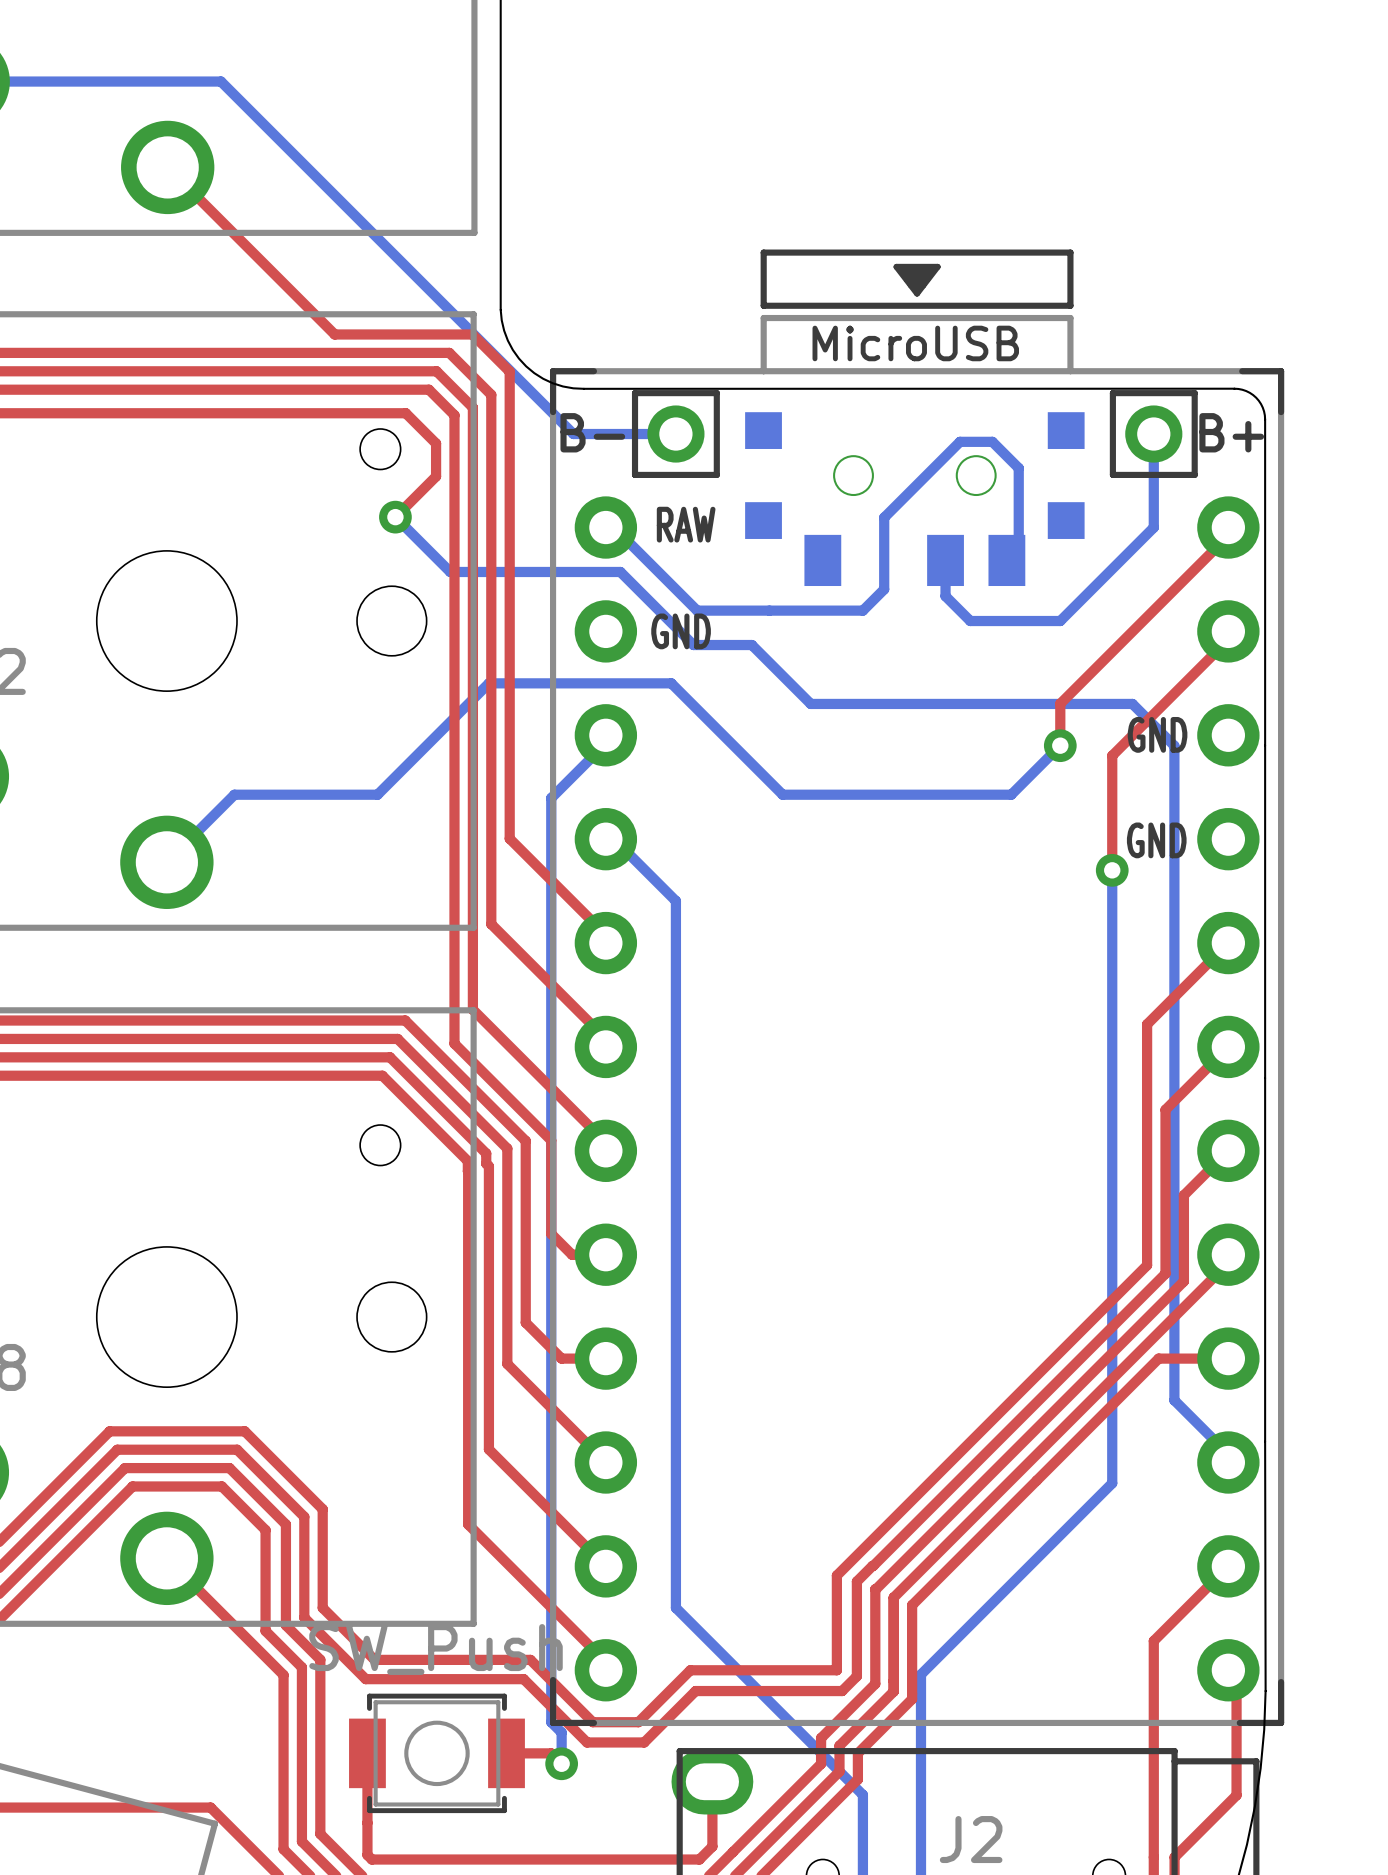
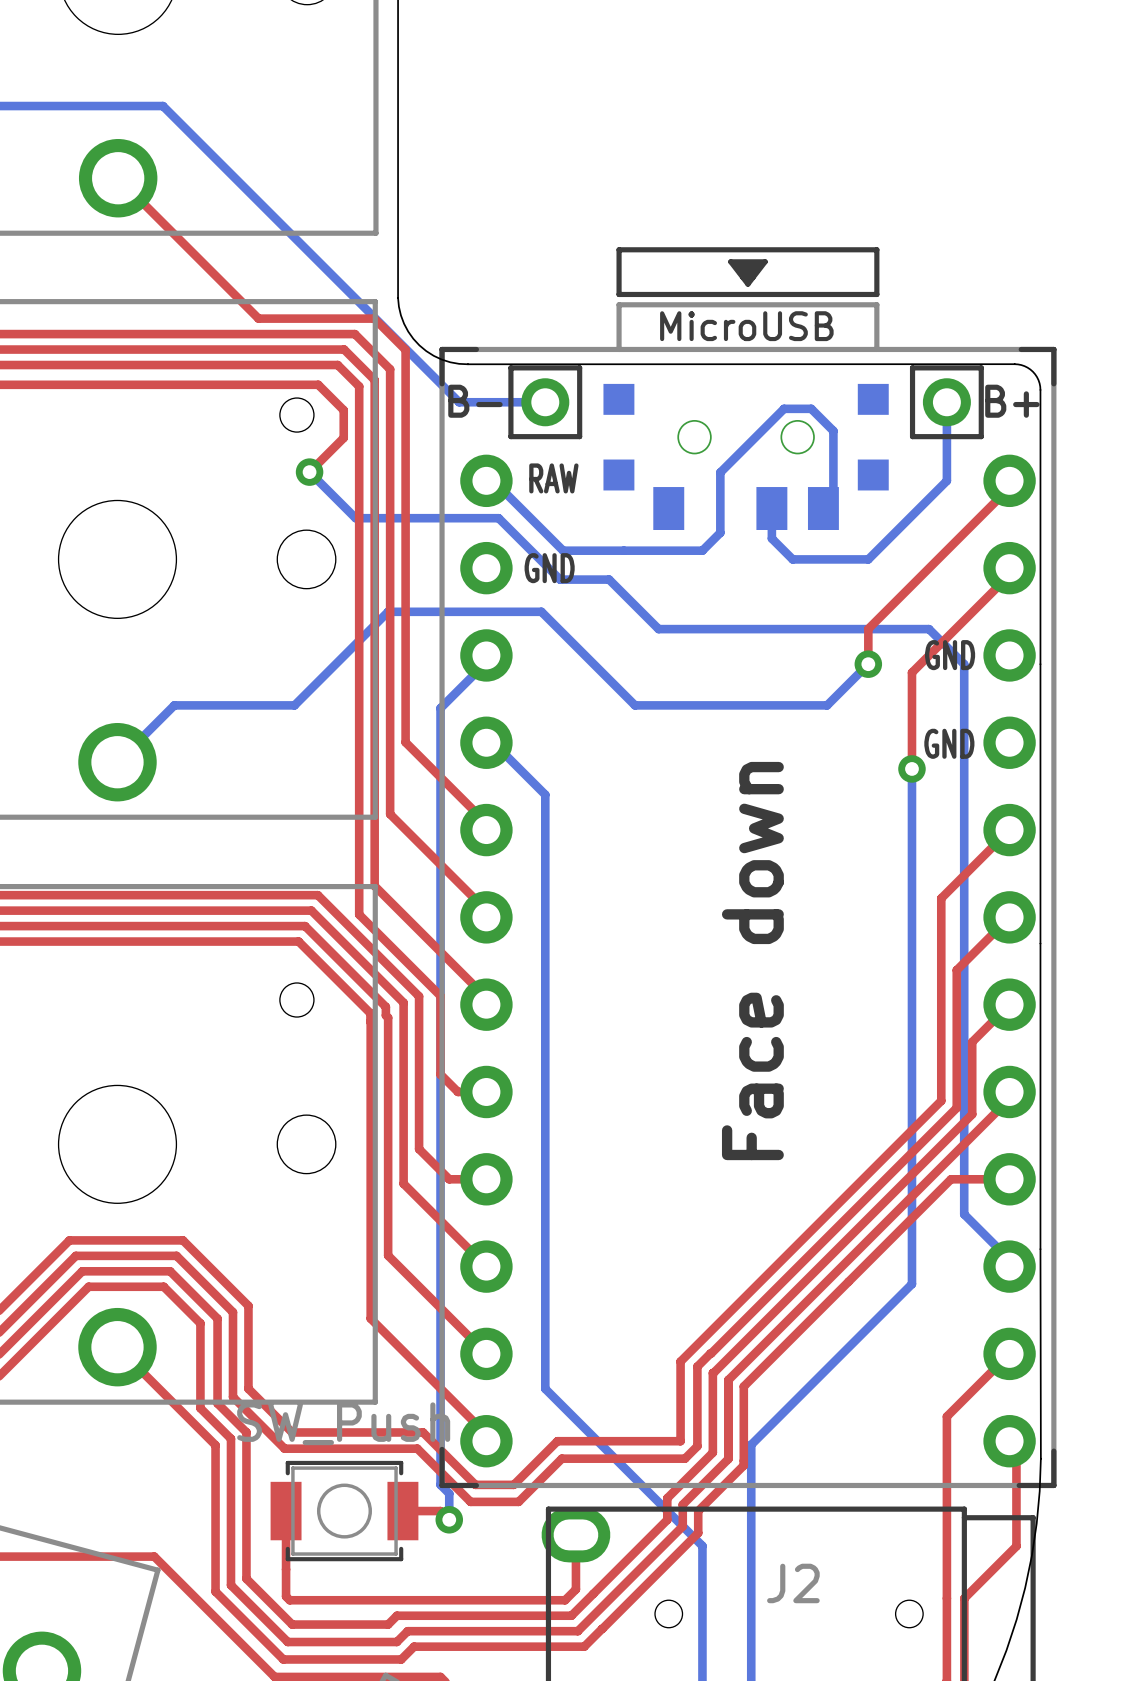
text: none -> Face down (752, 961)

